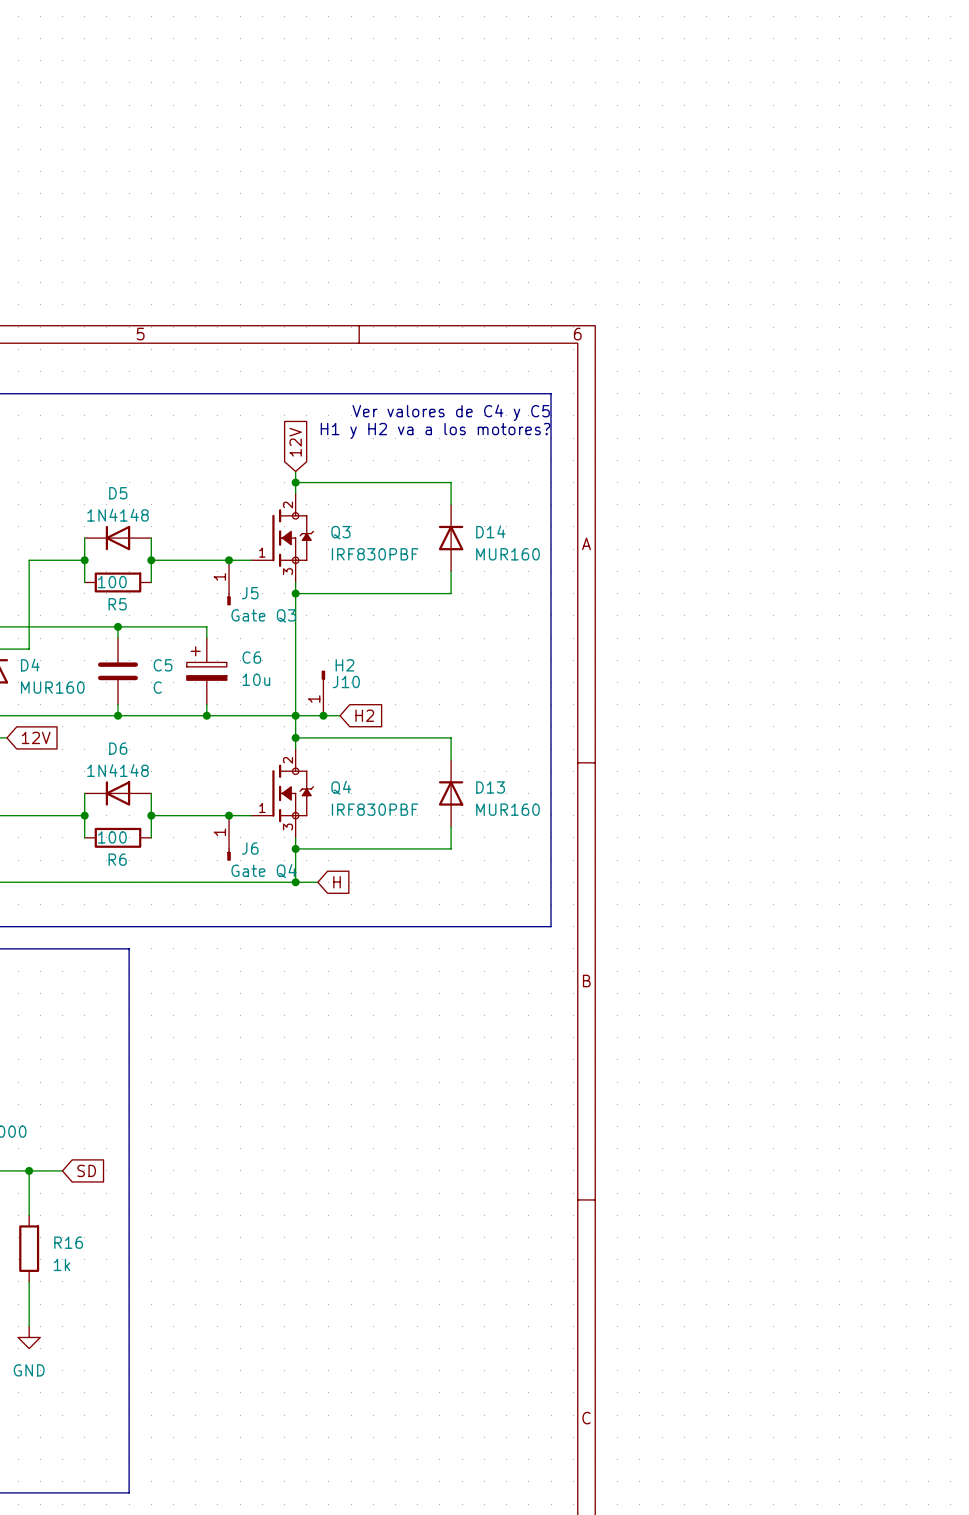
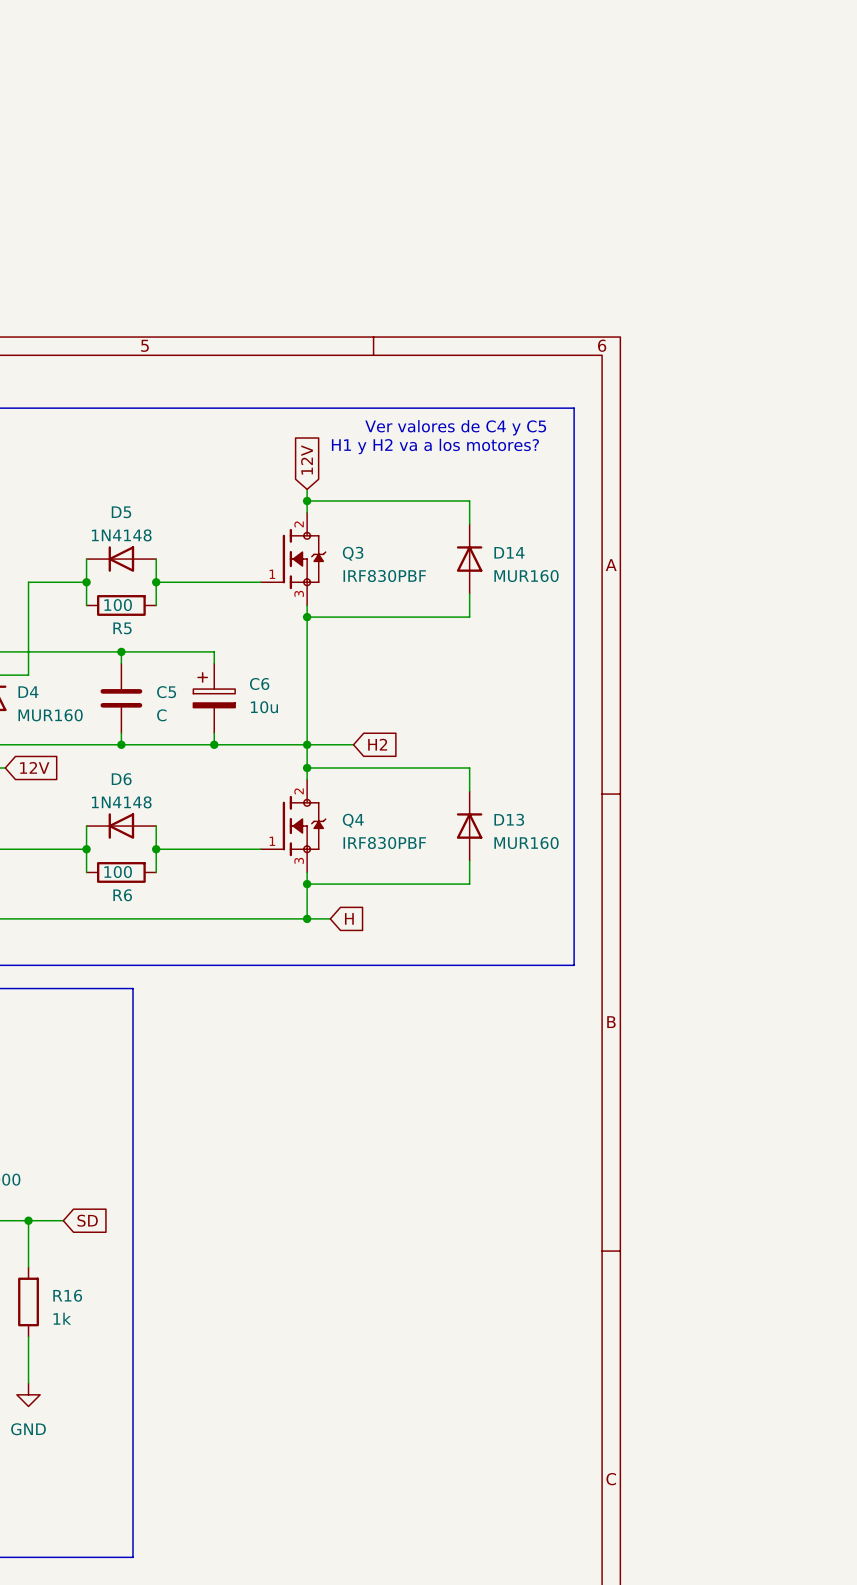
junction: (229, 560) -> none
J5: Gate Q3 (229, 582) -> none
J10: H2 (323, 693) -> none
junction: (323, 715) -> none
junction: (229, 815) -> none
J6: Gate Q4 (229, 838) -> none

